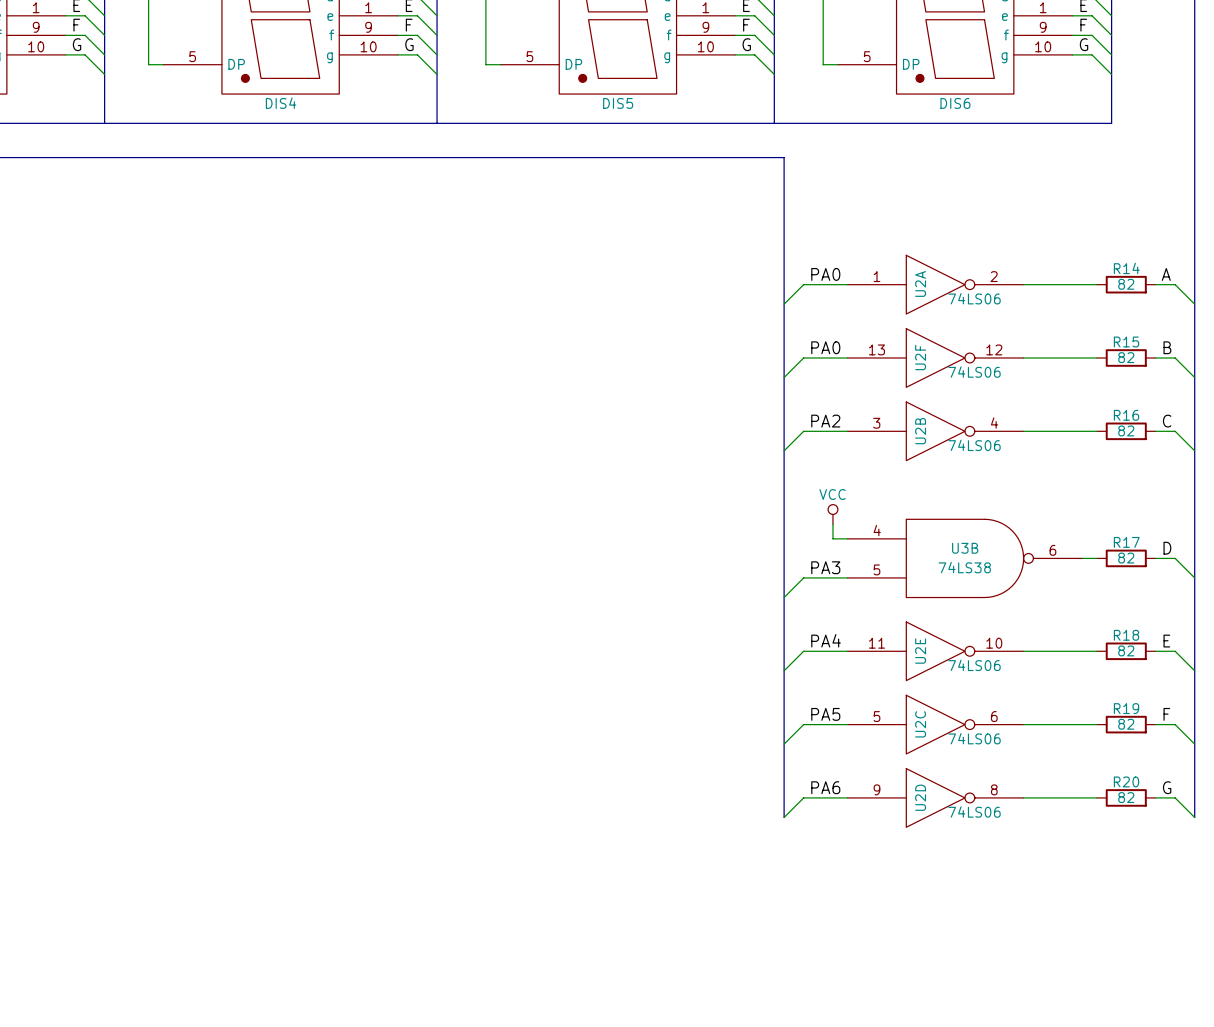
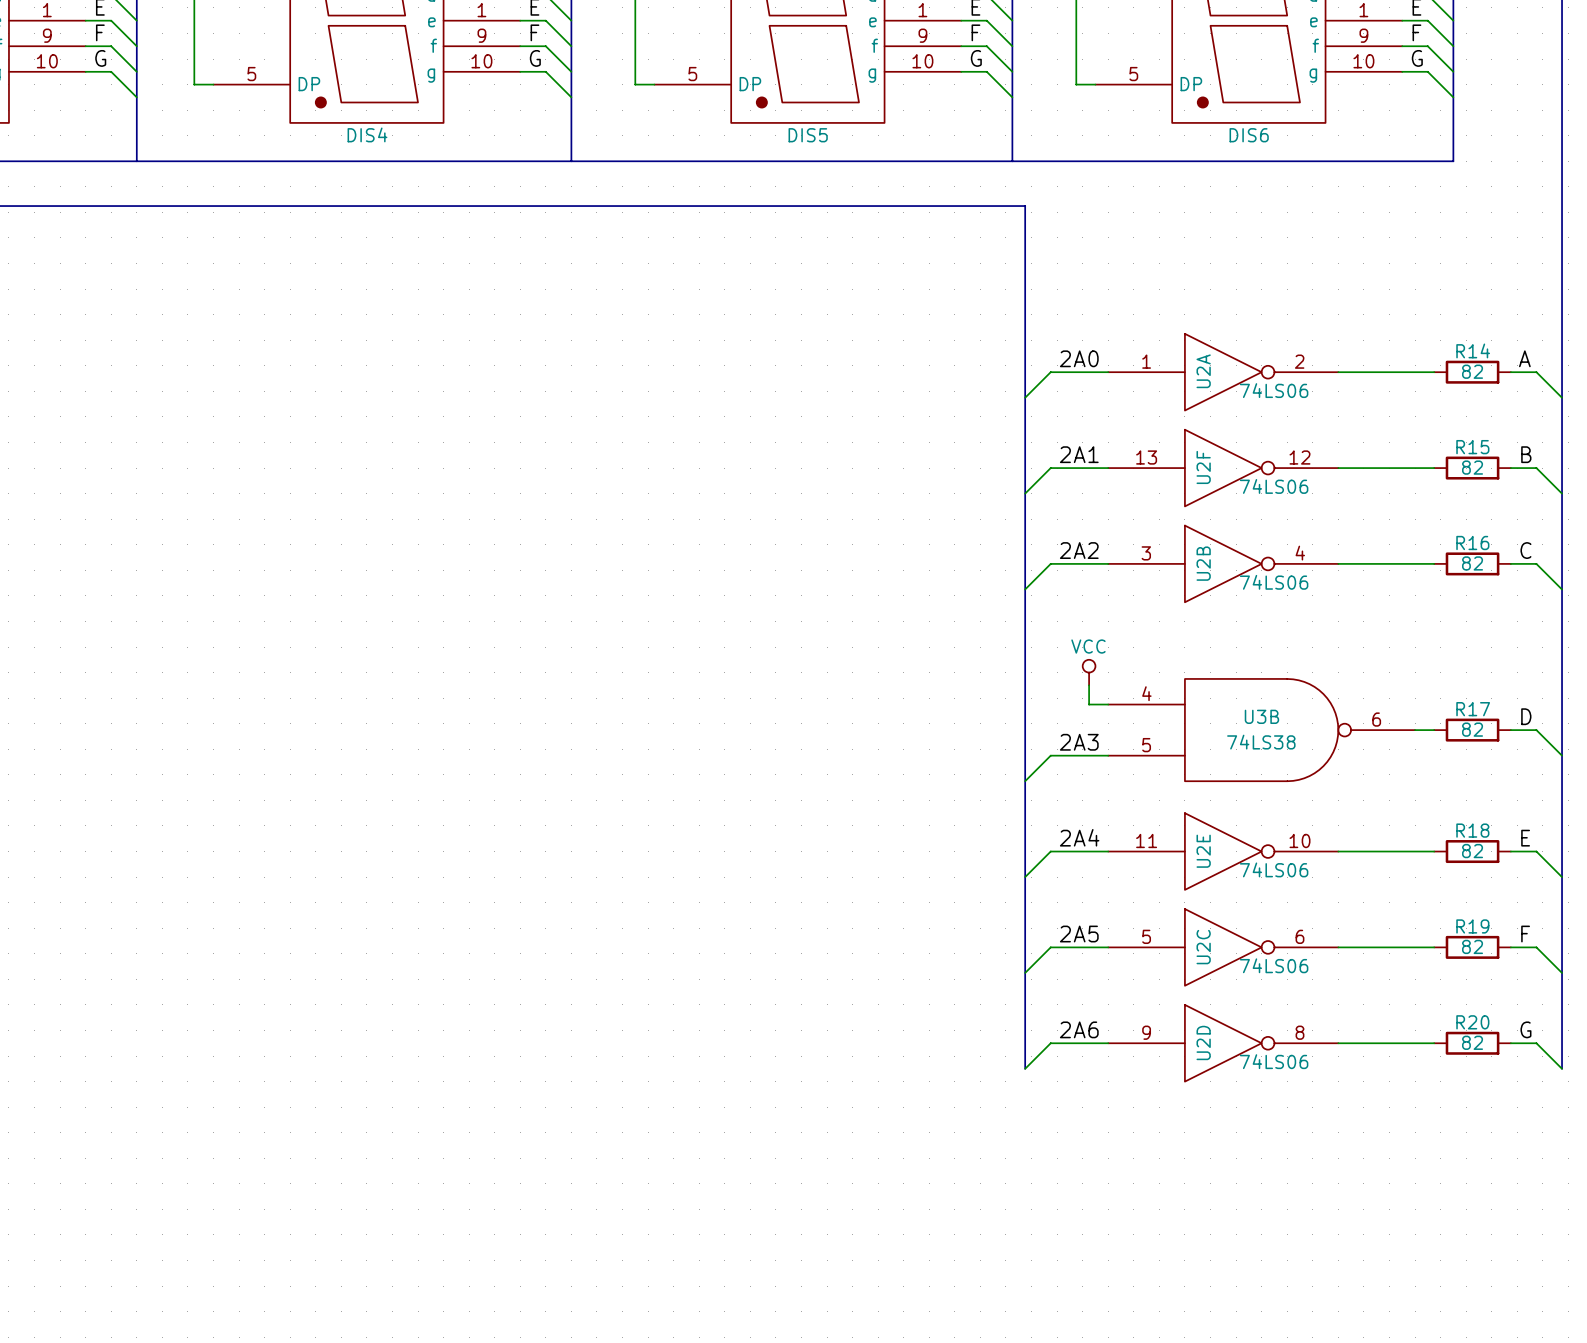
label: PA0 (825, 274) -> 2A0 (1079, 358)
label: PA0 (825, 347) -> 2A1 (1079, 454)
label: PA2 (825, 421) -> 2A2 (1079, 550)
label: PA3 (825, 567) -> 2A3 (1079, 742)
label: PA4 (826, 640) -> 2A4 (1079, 837)
label: PA5 (825, 714) -> 2A5 (1079, 934)
label: PA6 (825, 787) -> 2A6 (1079, 1029)

